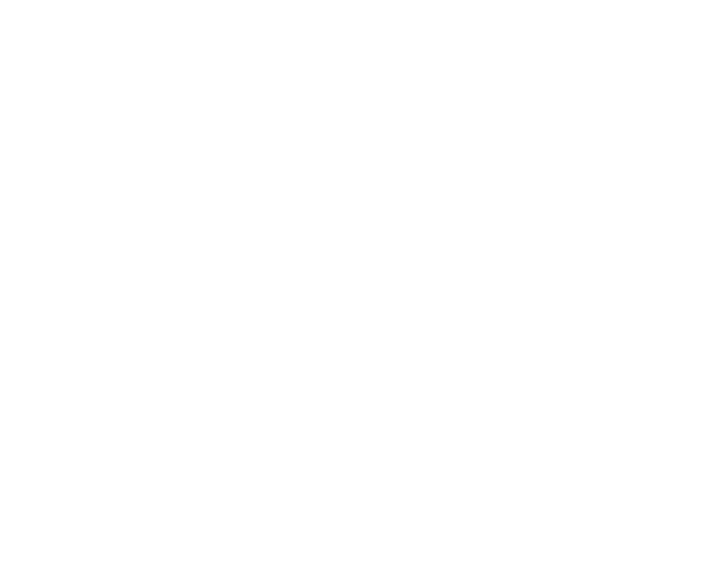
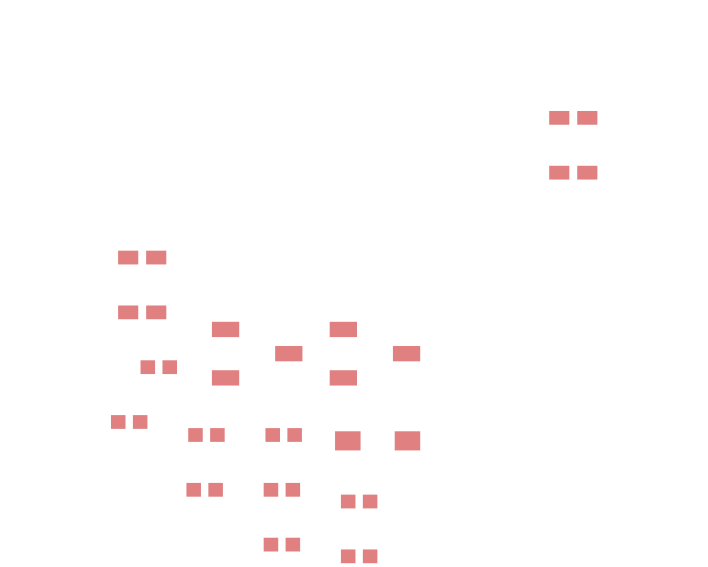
part: none -> (573, 117)
part: none -> (573, 172)
part: none -> (142, 257)
part: none -> (142, 312)
part: none -> (257, 353)
part: none -> (374, 353)
part: none -> (158, 367)
part: none -> (129, 421)
part: none -> (206, 434)
part: none -> (283, 434)
part: none -> (377, 440)
part: none -> (204, 489)
part: none -> (281, 489)
part: none -> (359, 501)
part: none -> (281, 544)
part: none -> (359, 556)

